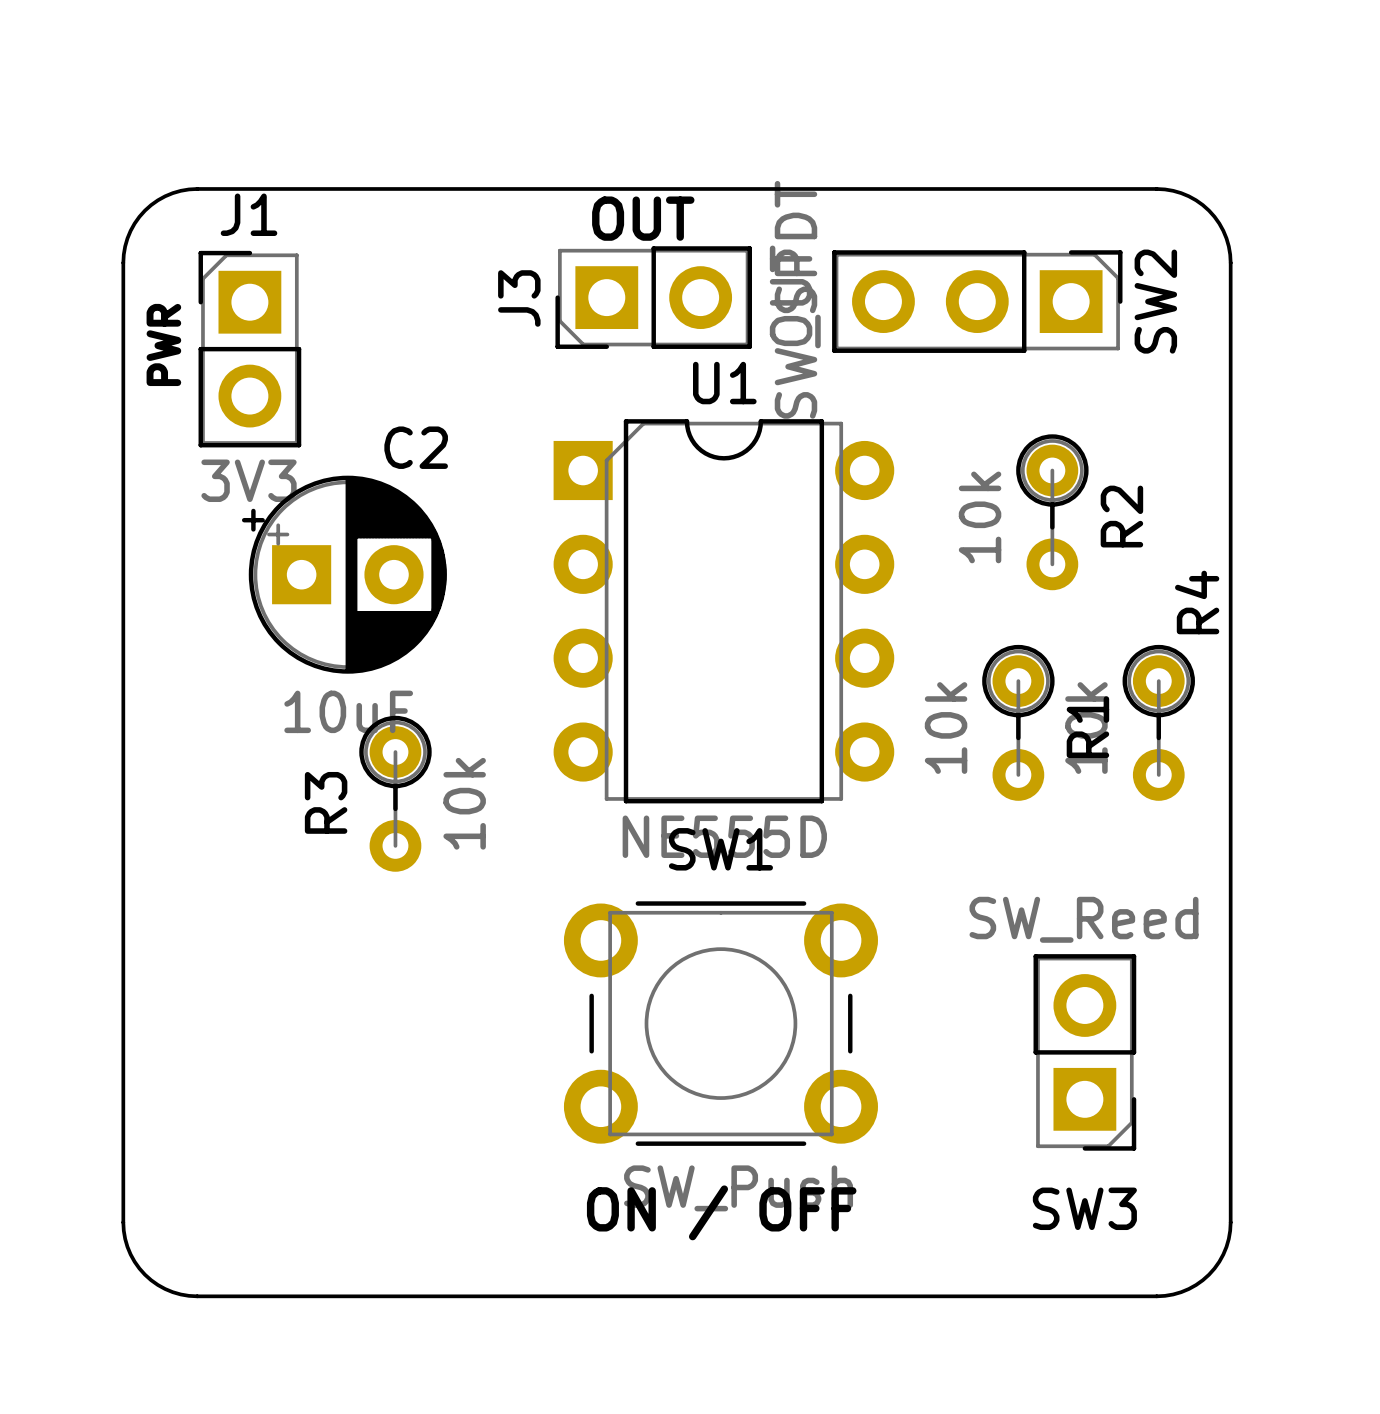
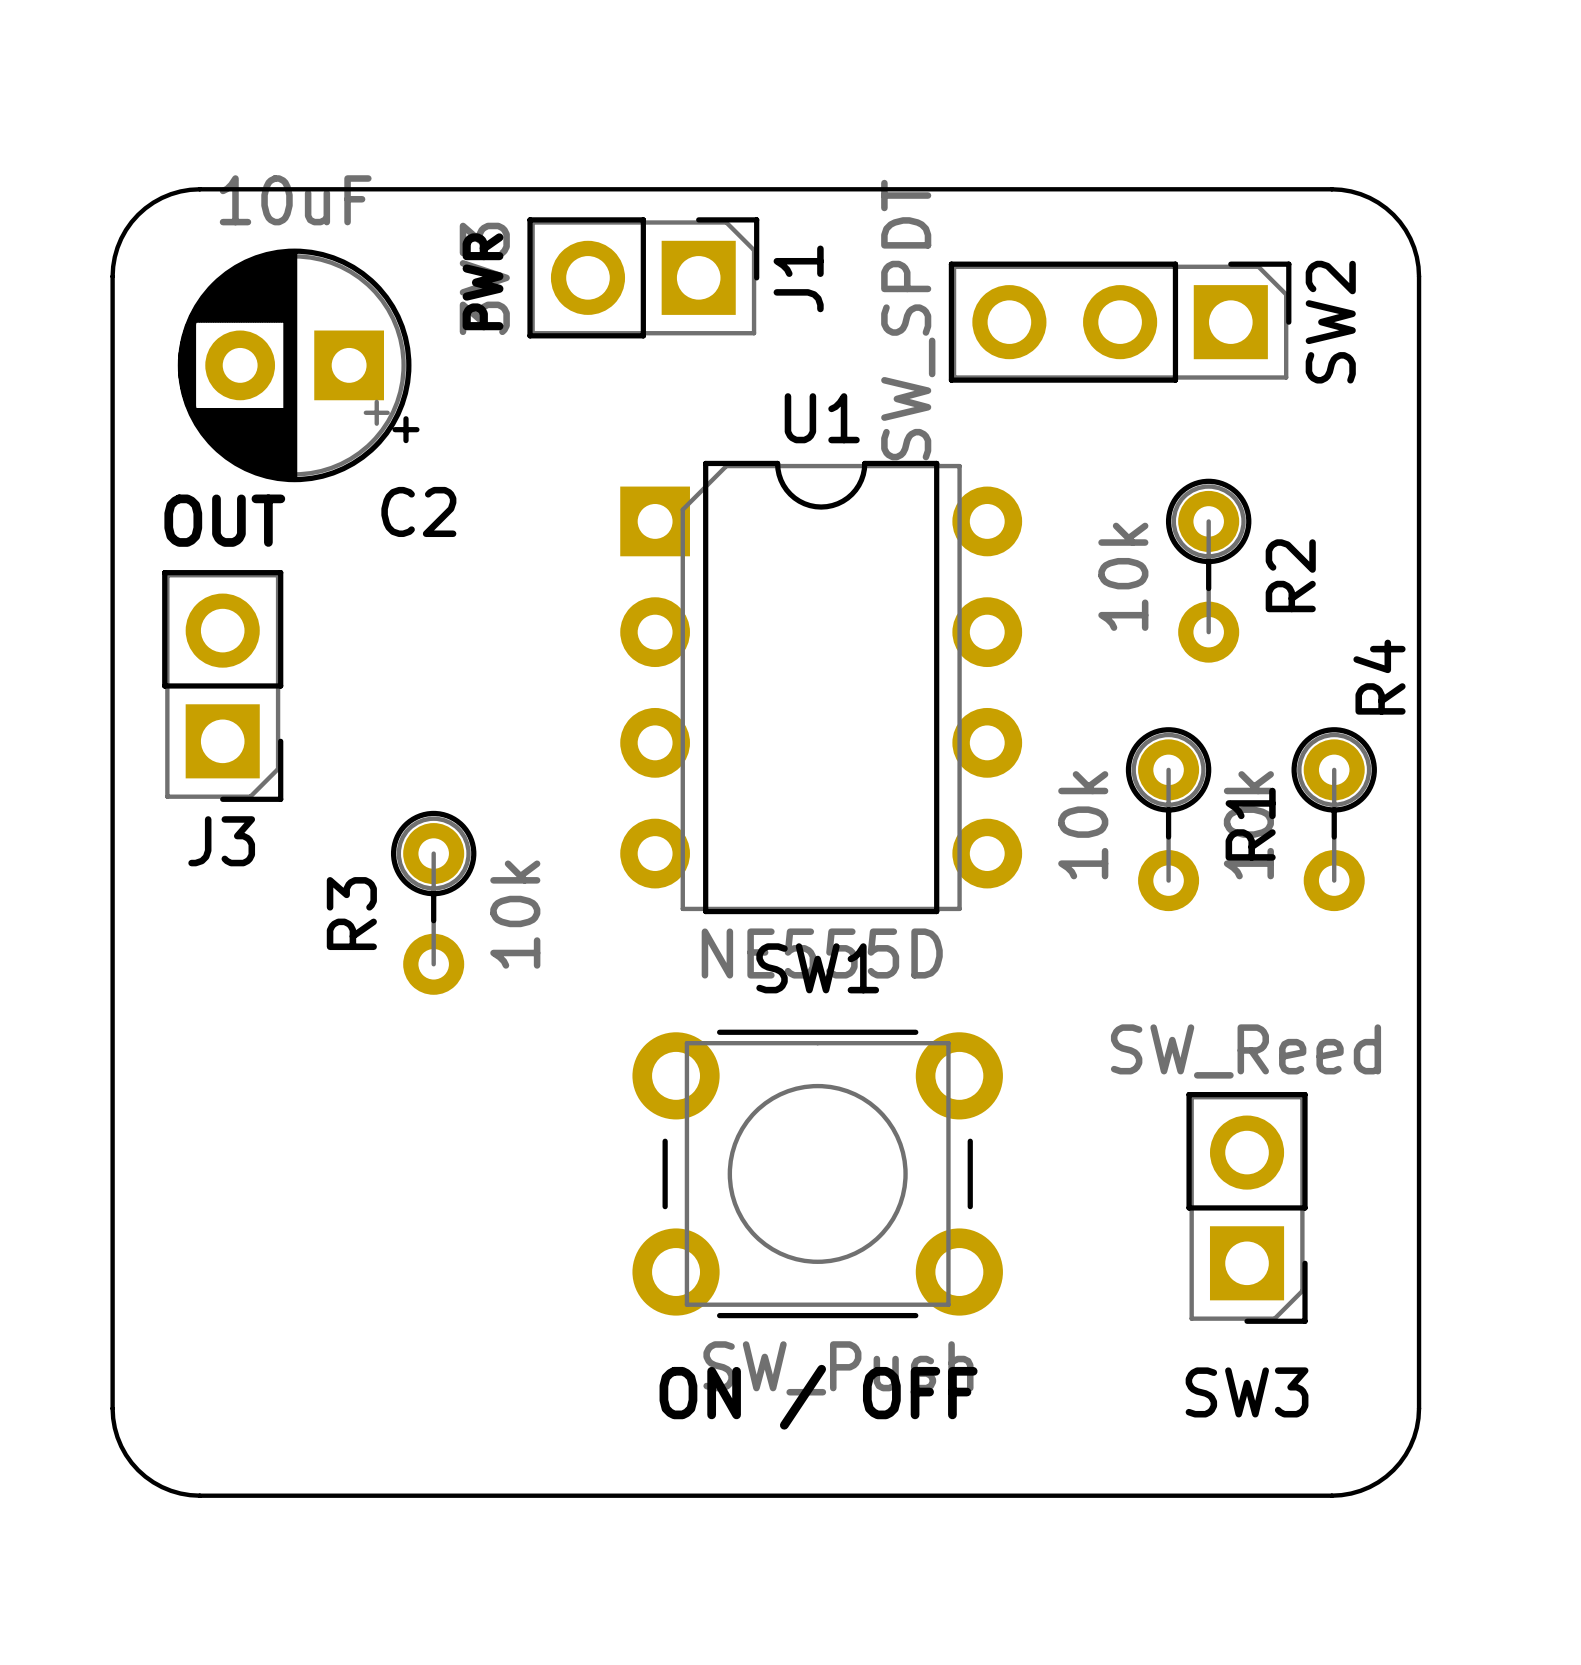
text position: OUT (643, 218) -> OUT (224, 520)
J3 rotation: 0° (653, 297) -> 90° counterclockwise (222, 685)
J3 position: (653, 297) -> (222, 685)
text position: PWR (163, 344) -> PWR (483, 281)
J1 rotation: 0° (249, 349) -> 90° clockwise (643, 277)
J1 position: (249, 349) -> (643, 277)
C2 name position: C2 (416, 447) -> C2 (418, 511)
C2 rotation: 0° (344, 574) -> 180° (298, 365)
C2 position: (344, 574) -> (298, 365)

